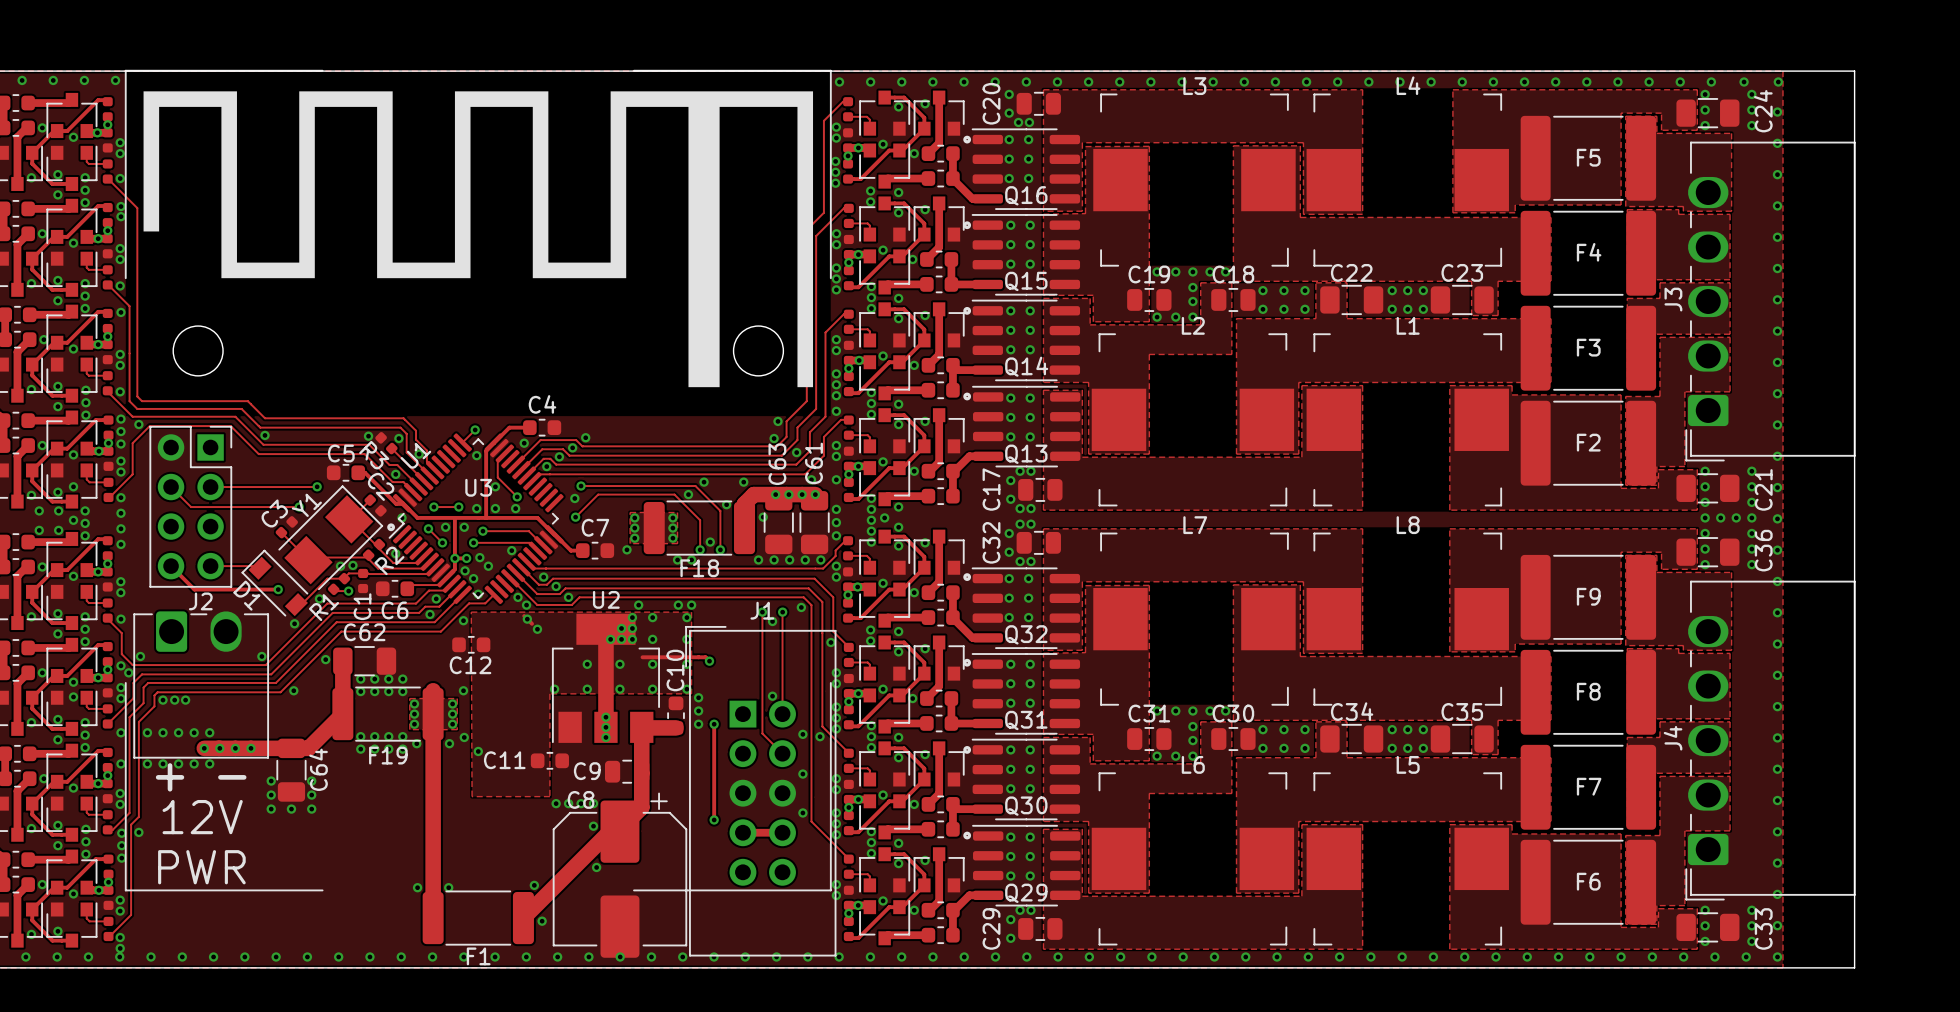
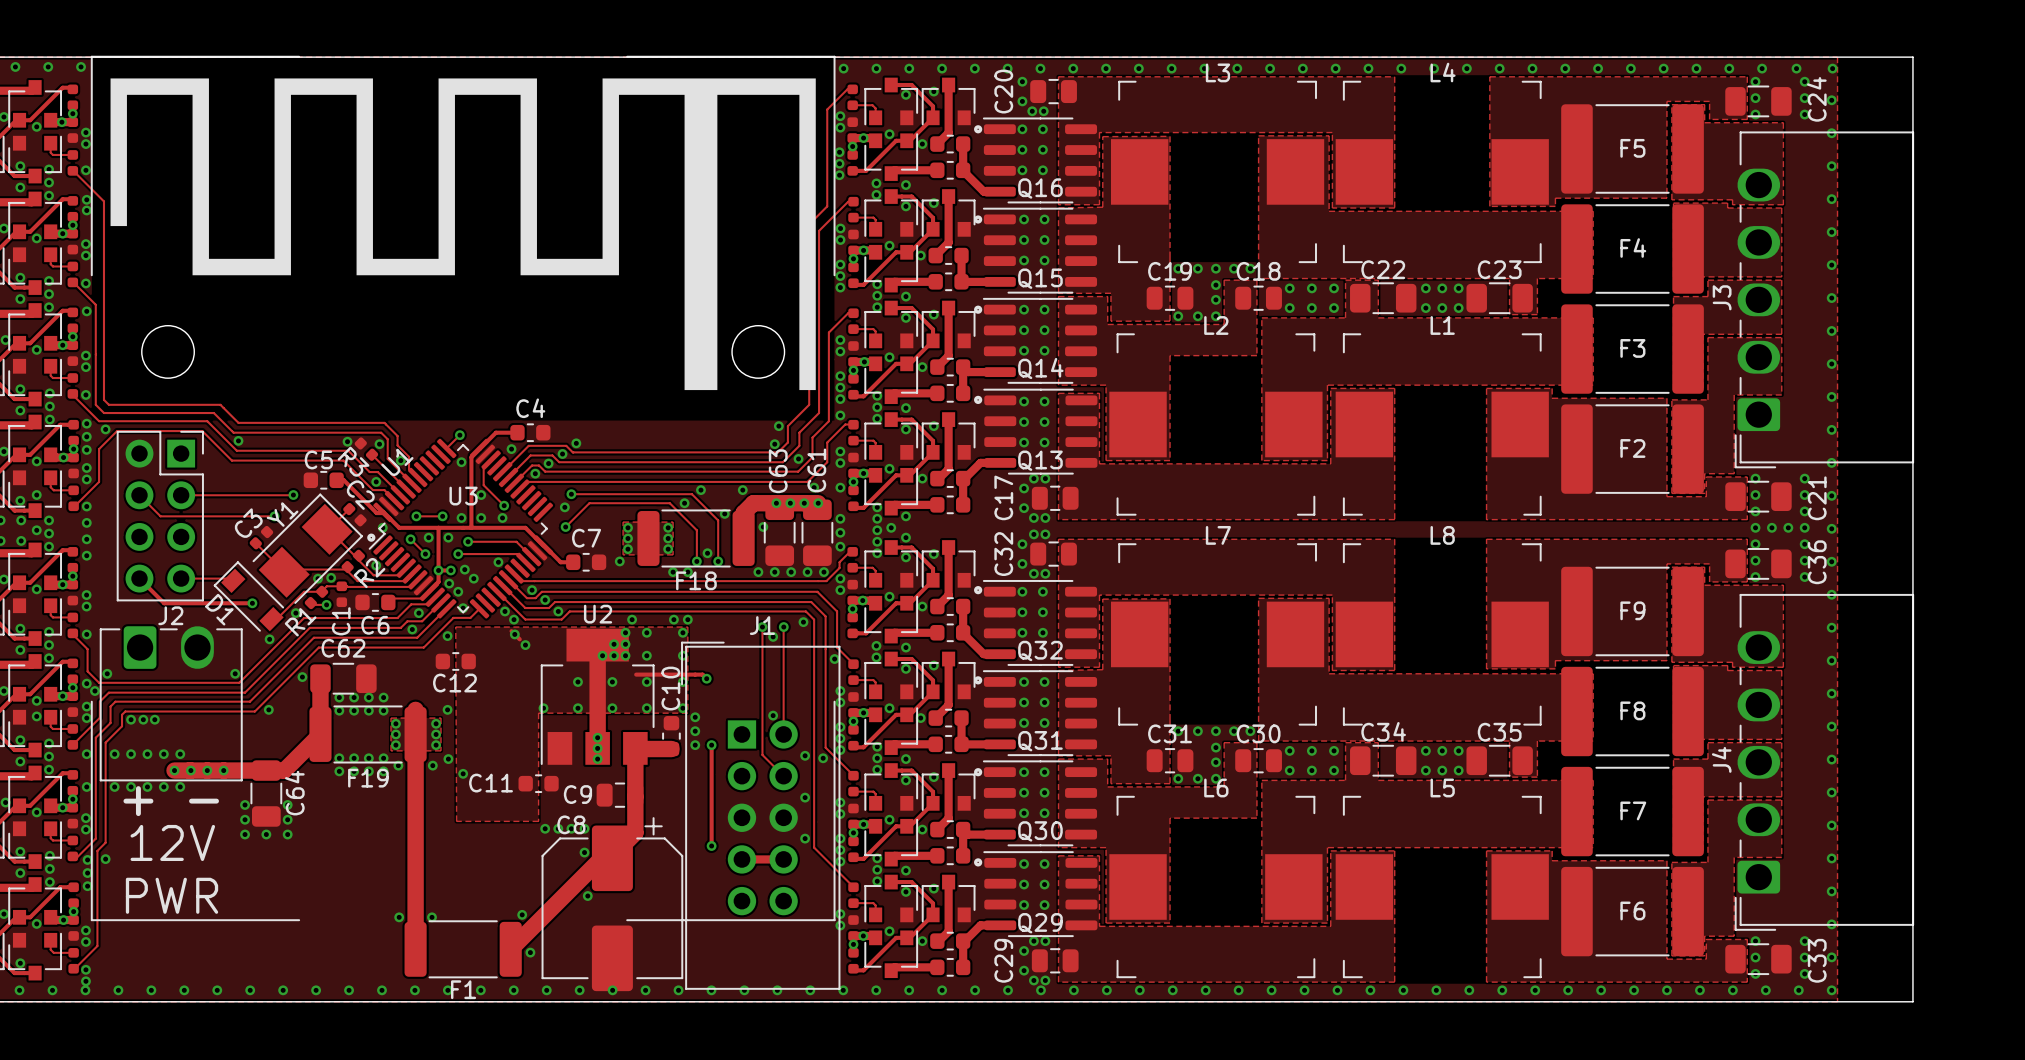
via: none -> (1033, 980)
via: none -> (1045, 980)

